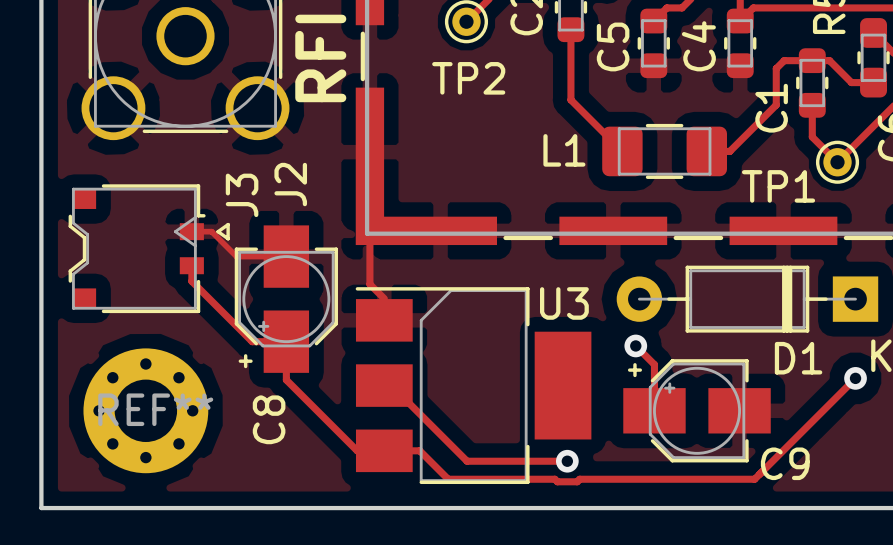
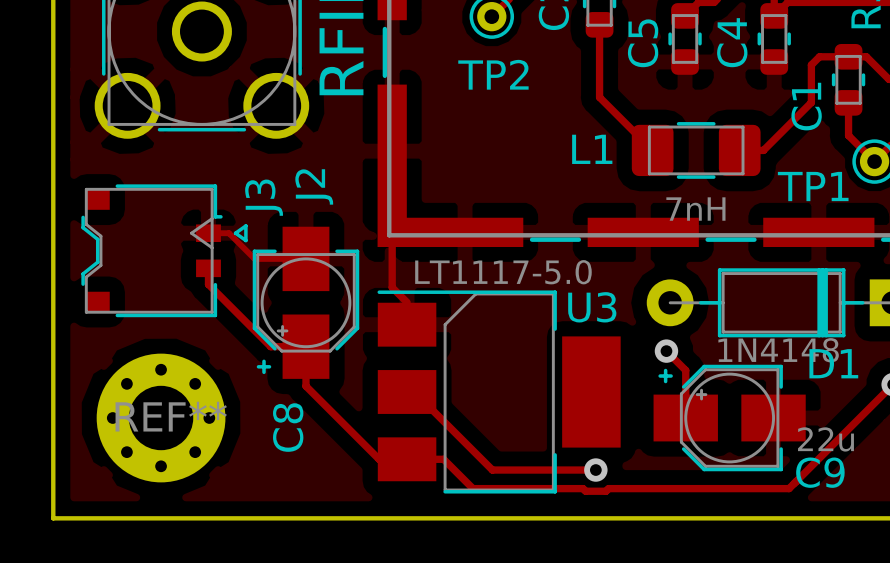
L1 value: none -> 7nH (695, 209)
U3 value: none -> LT1117-5.0 (503, 272)
D1 value: none -> 1N4148 (778, 350)
C9 value: none -> 22u (825, 439)

